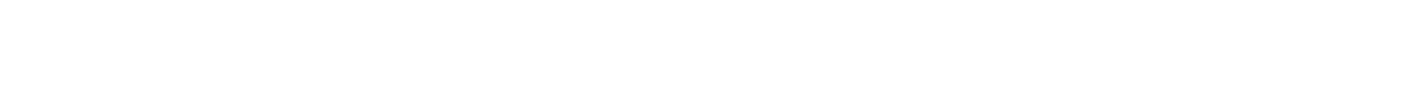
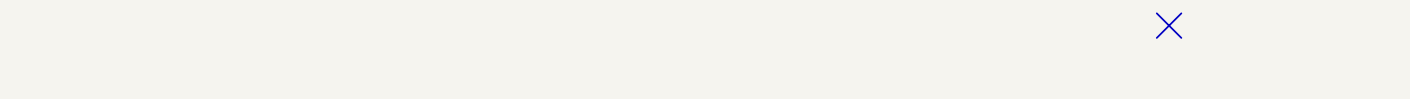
no-connect mark: none -> (1169, 25)

